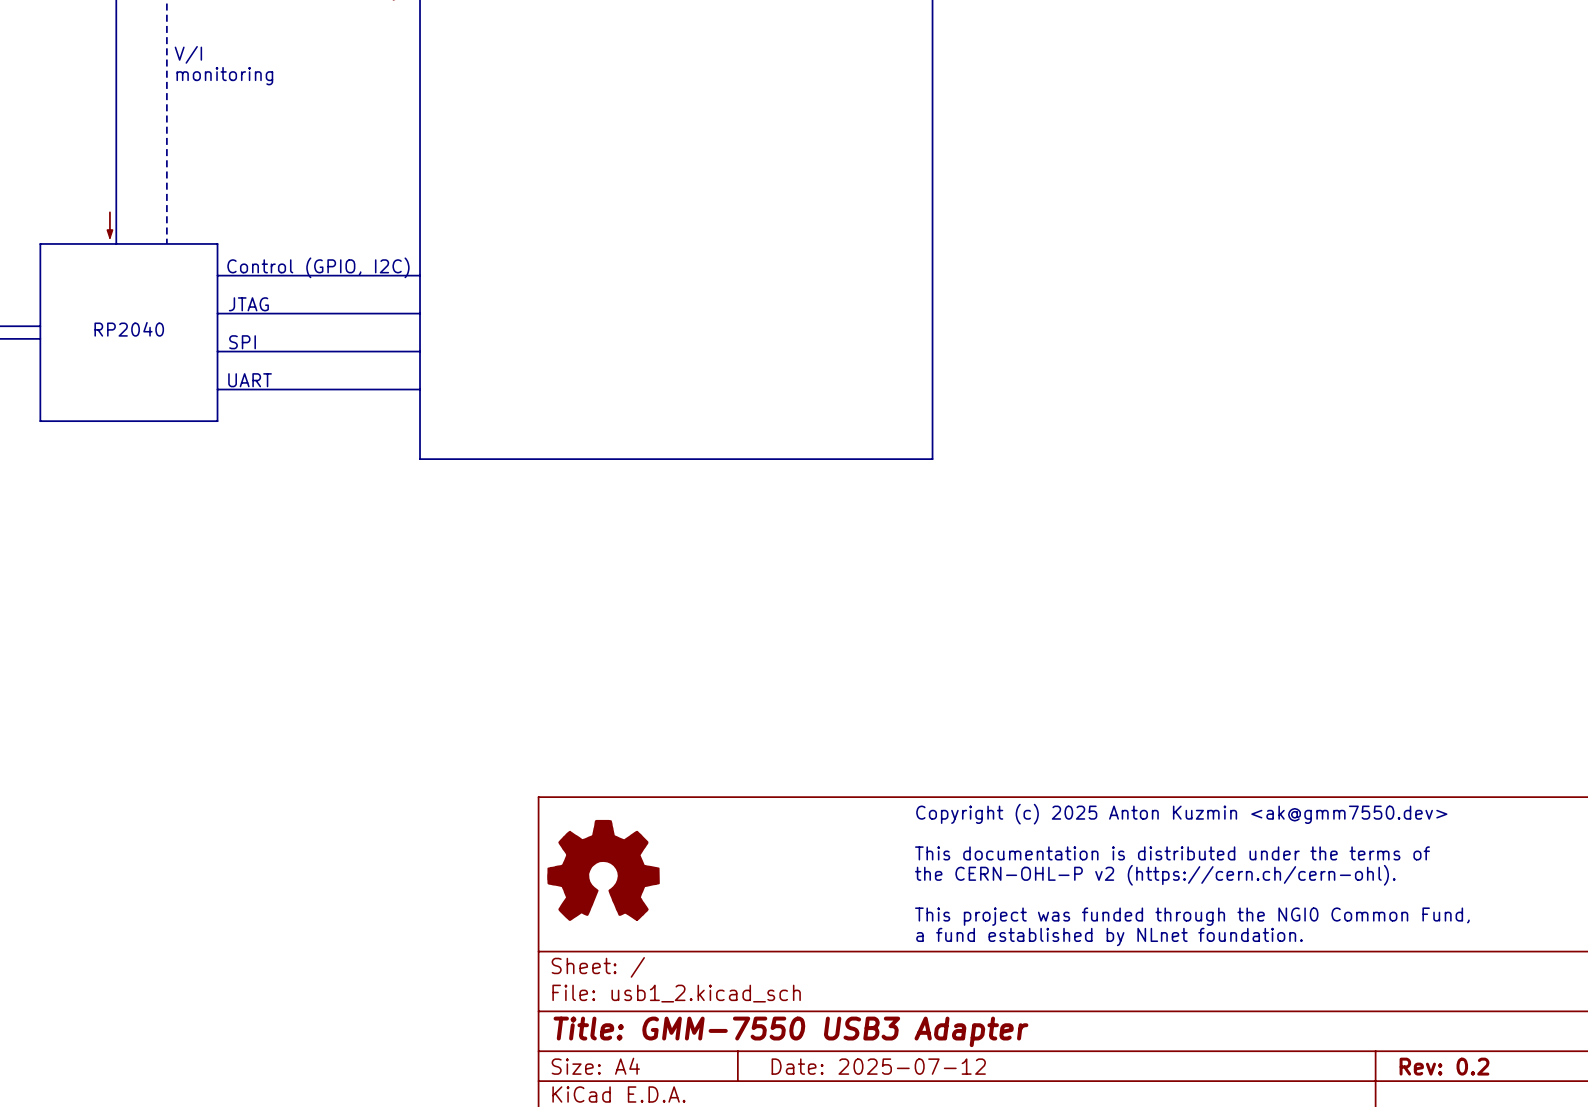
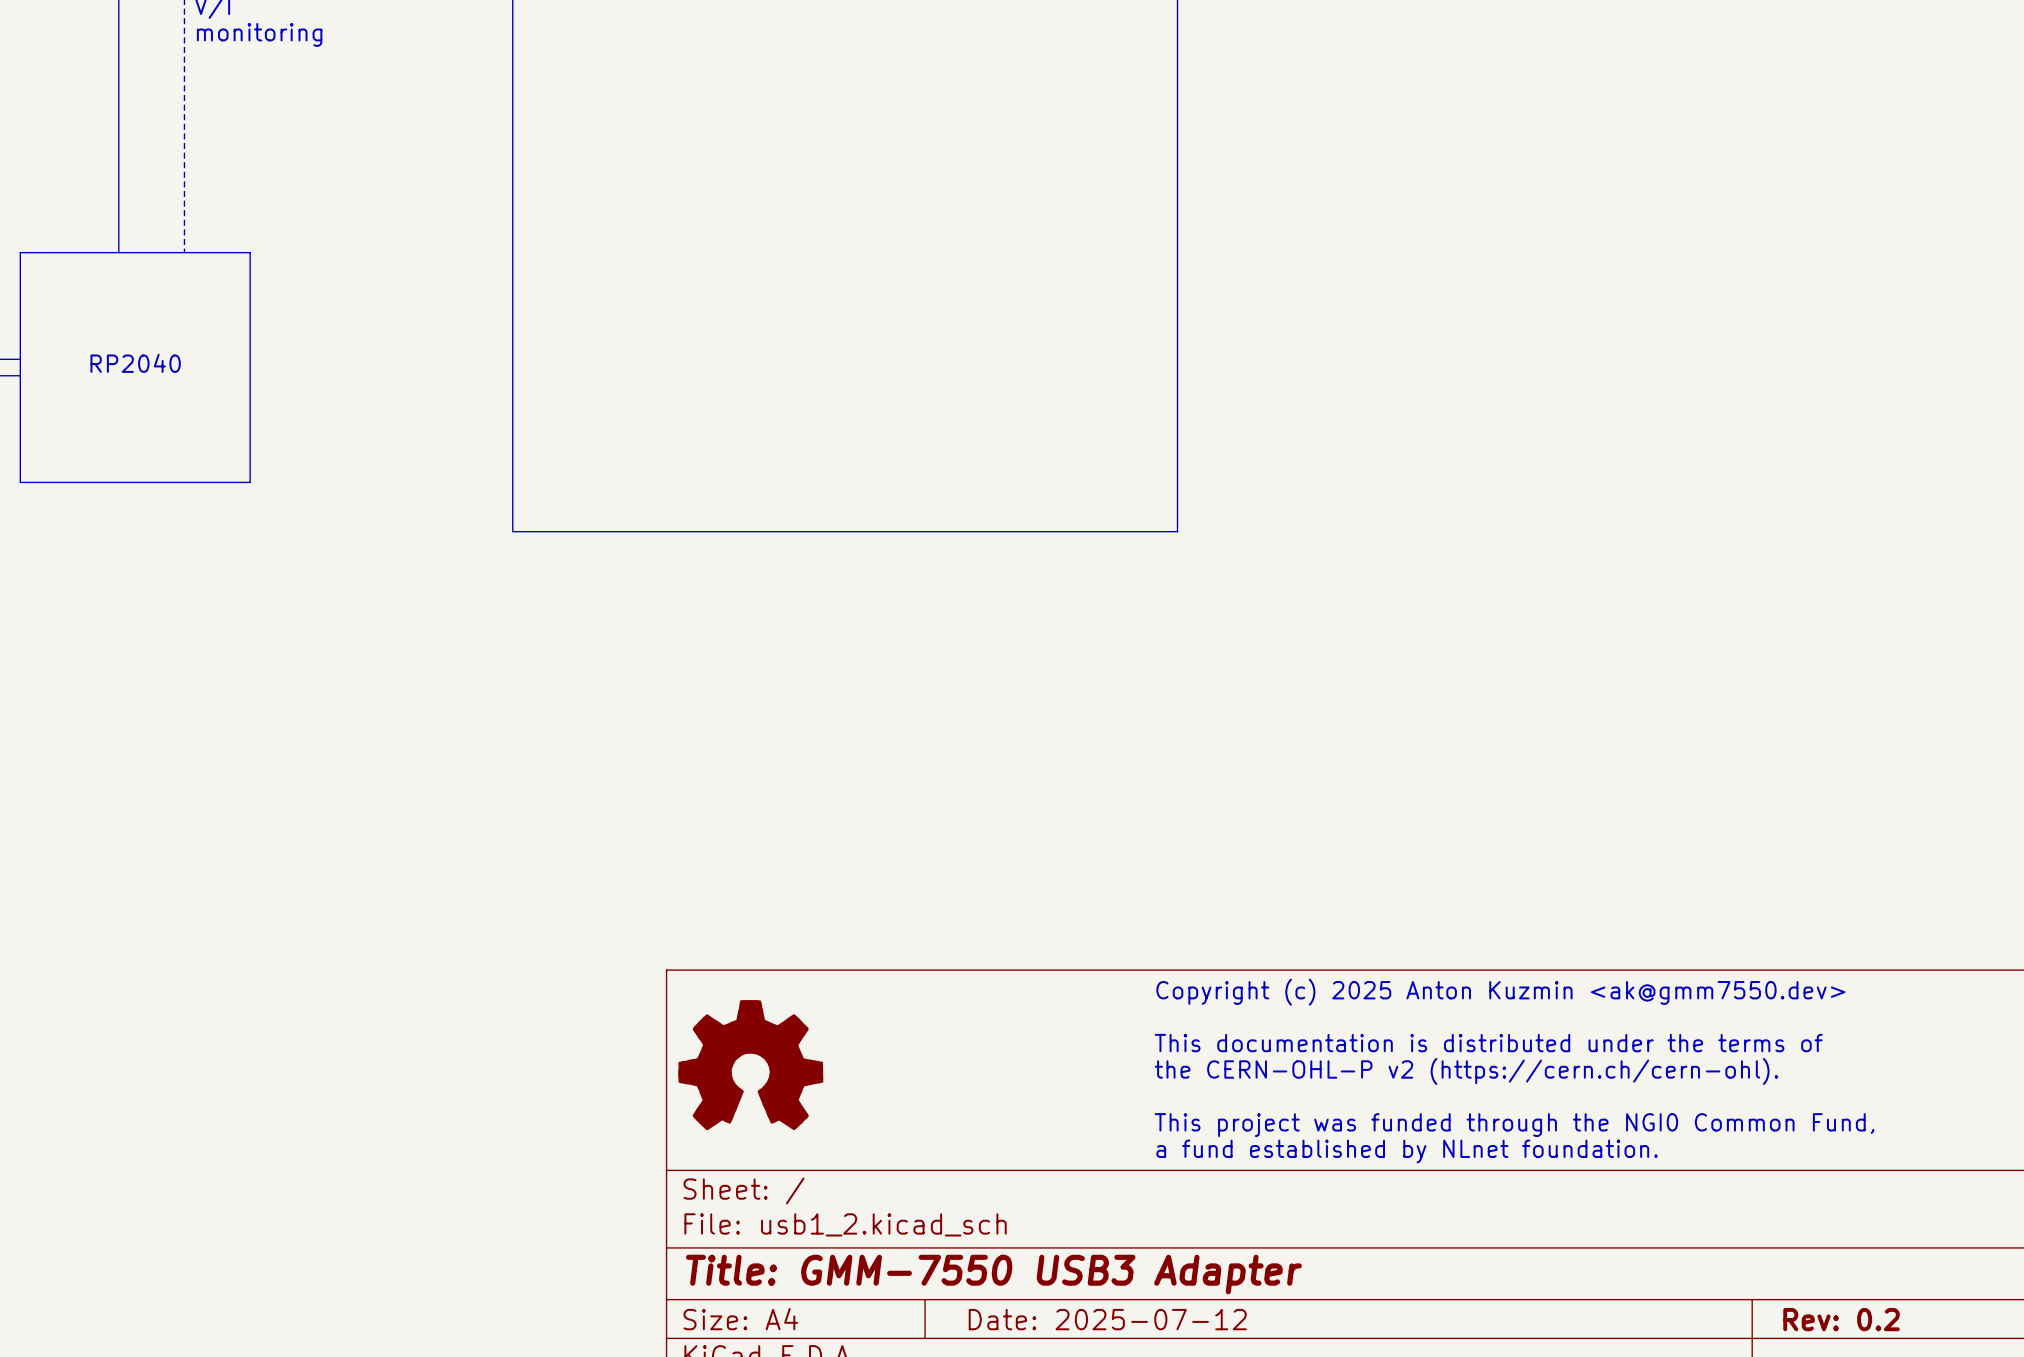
power symbol: (109, 225) -> none
text: Control (GPIO, I2C) (318, 267) -> none
line: (217, 275) (420, 275) -> none
text: JTAG (248, 304) -> none
line: (217, 313) (420, 313) -> none
text: SPI (242, 342) -> none
line: (217, 351) (420, 351) -> none
text: UART (250, 380) -> none
line: (217, 389) (420, 389) -> none

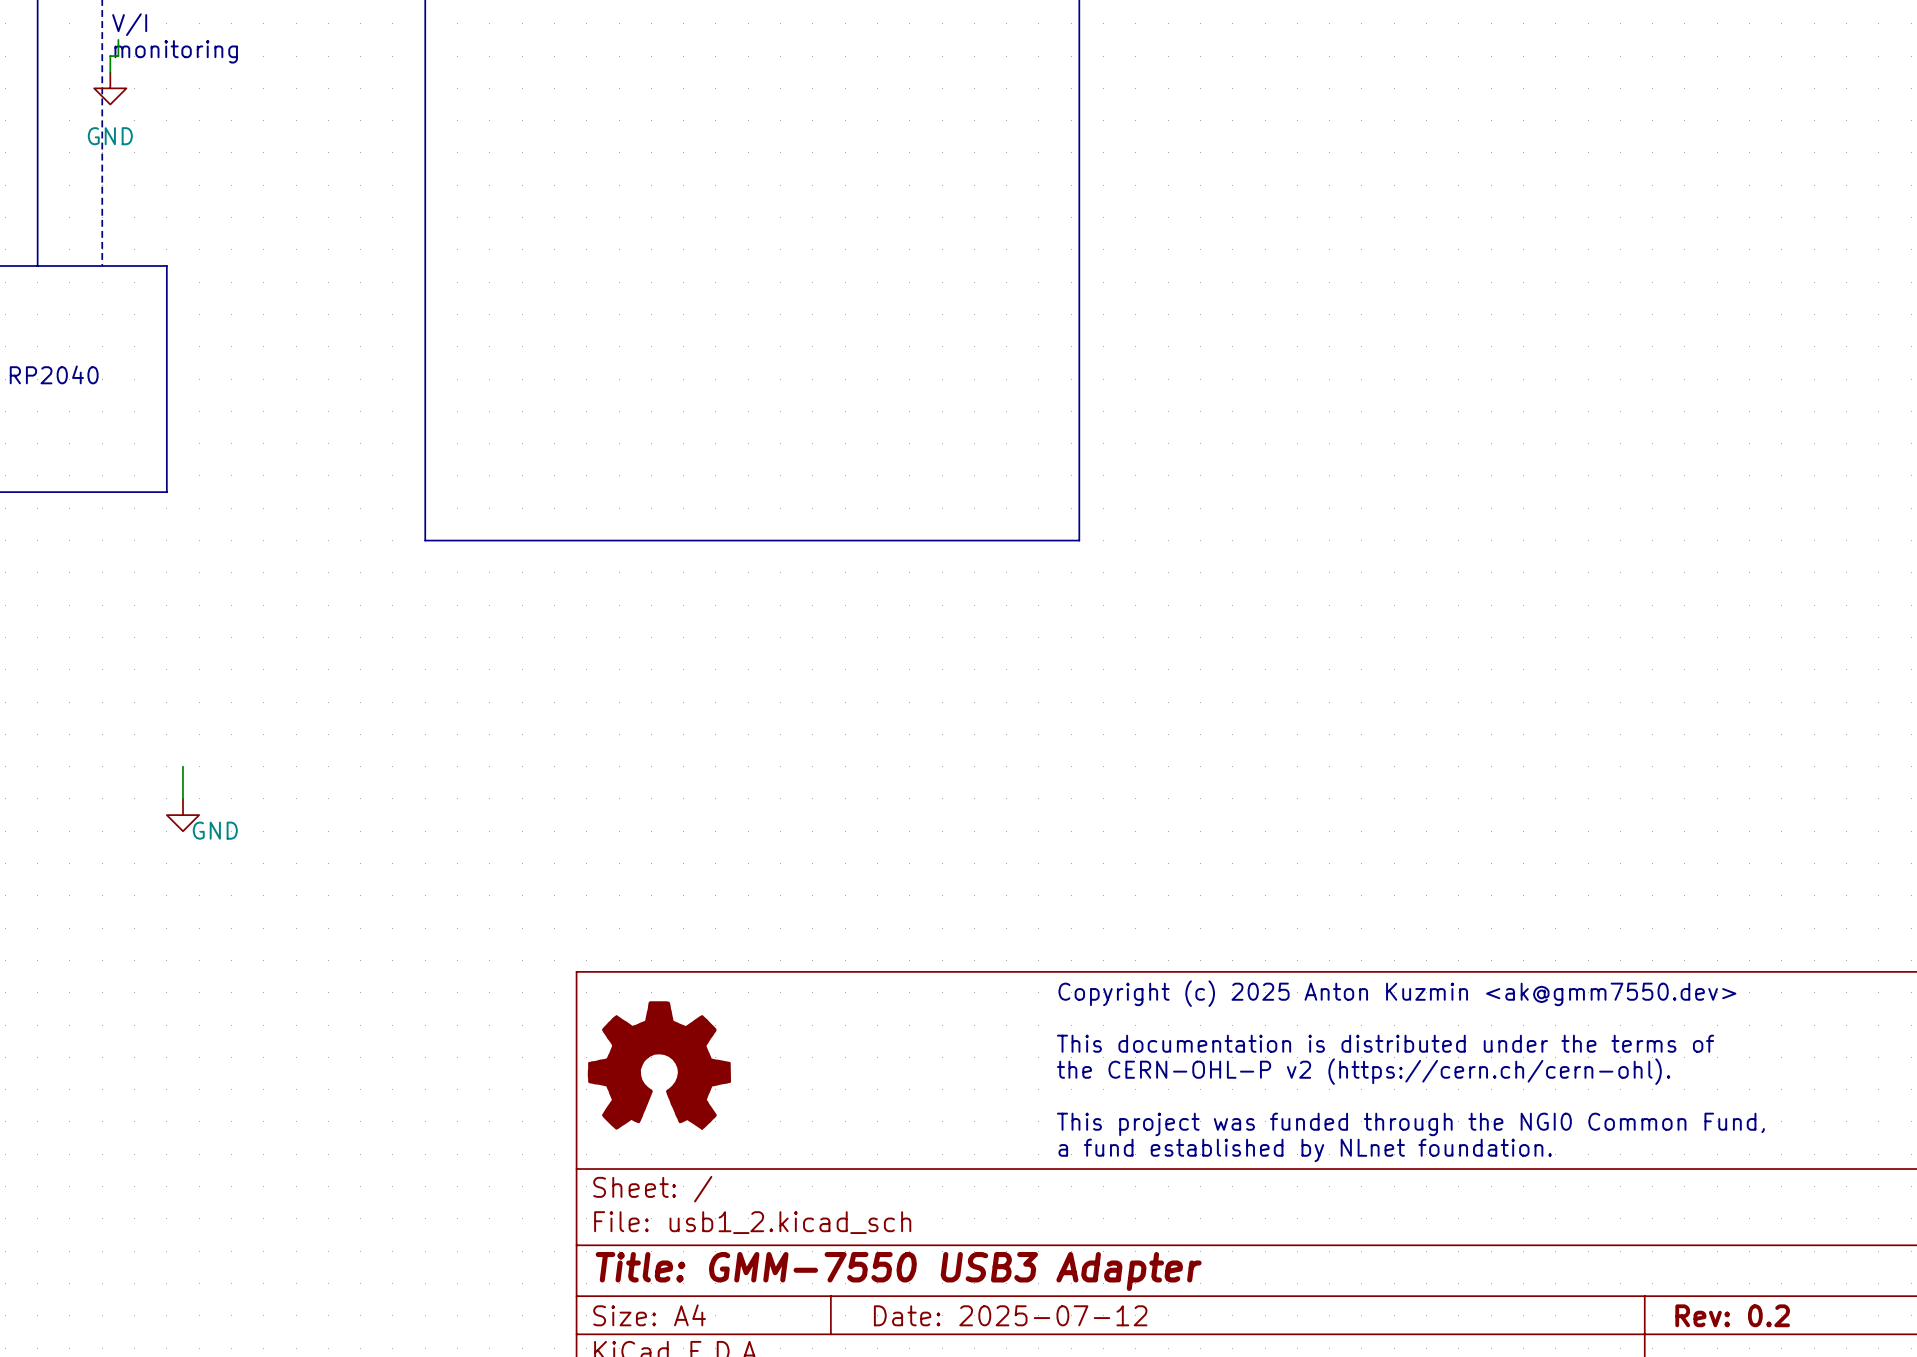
wire: none -> (118, 39) (118, 56) (110, 56) (110, 72)
power symbol: none -> GND (110, 88)
wire: none -> (182, 766) (182, 798)
power symbol: none -> GND (182, 815)

